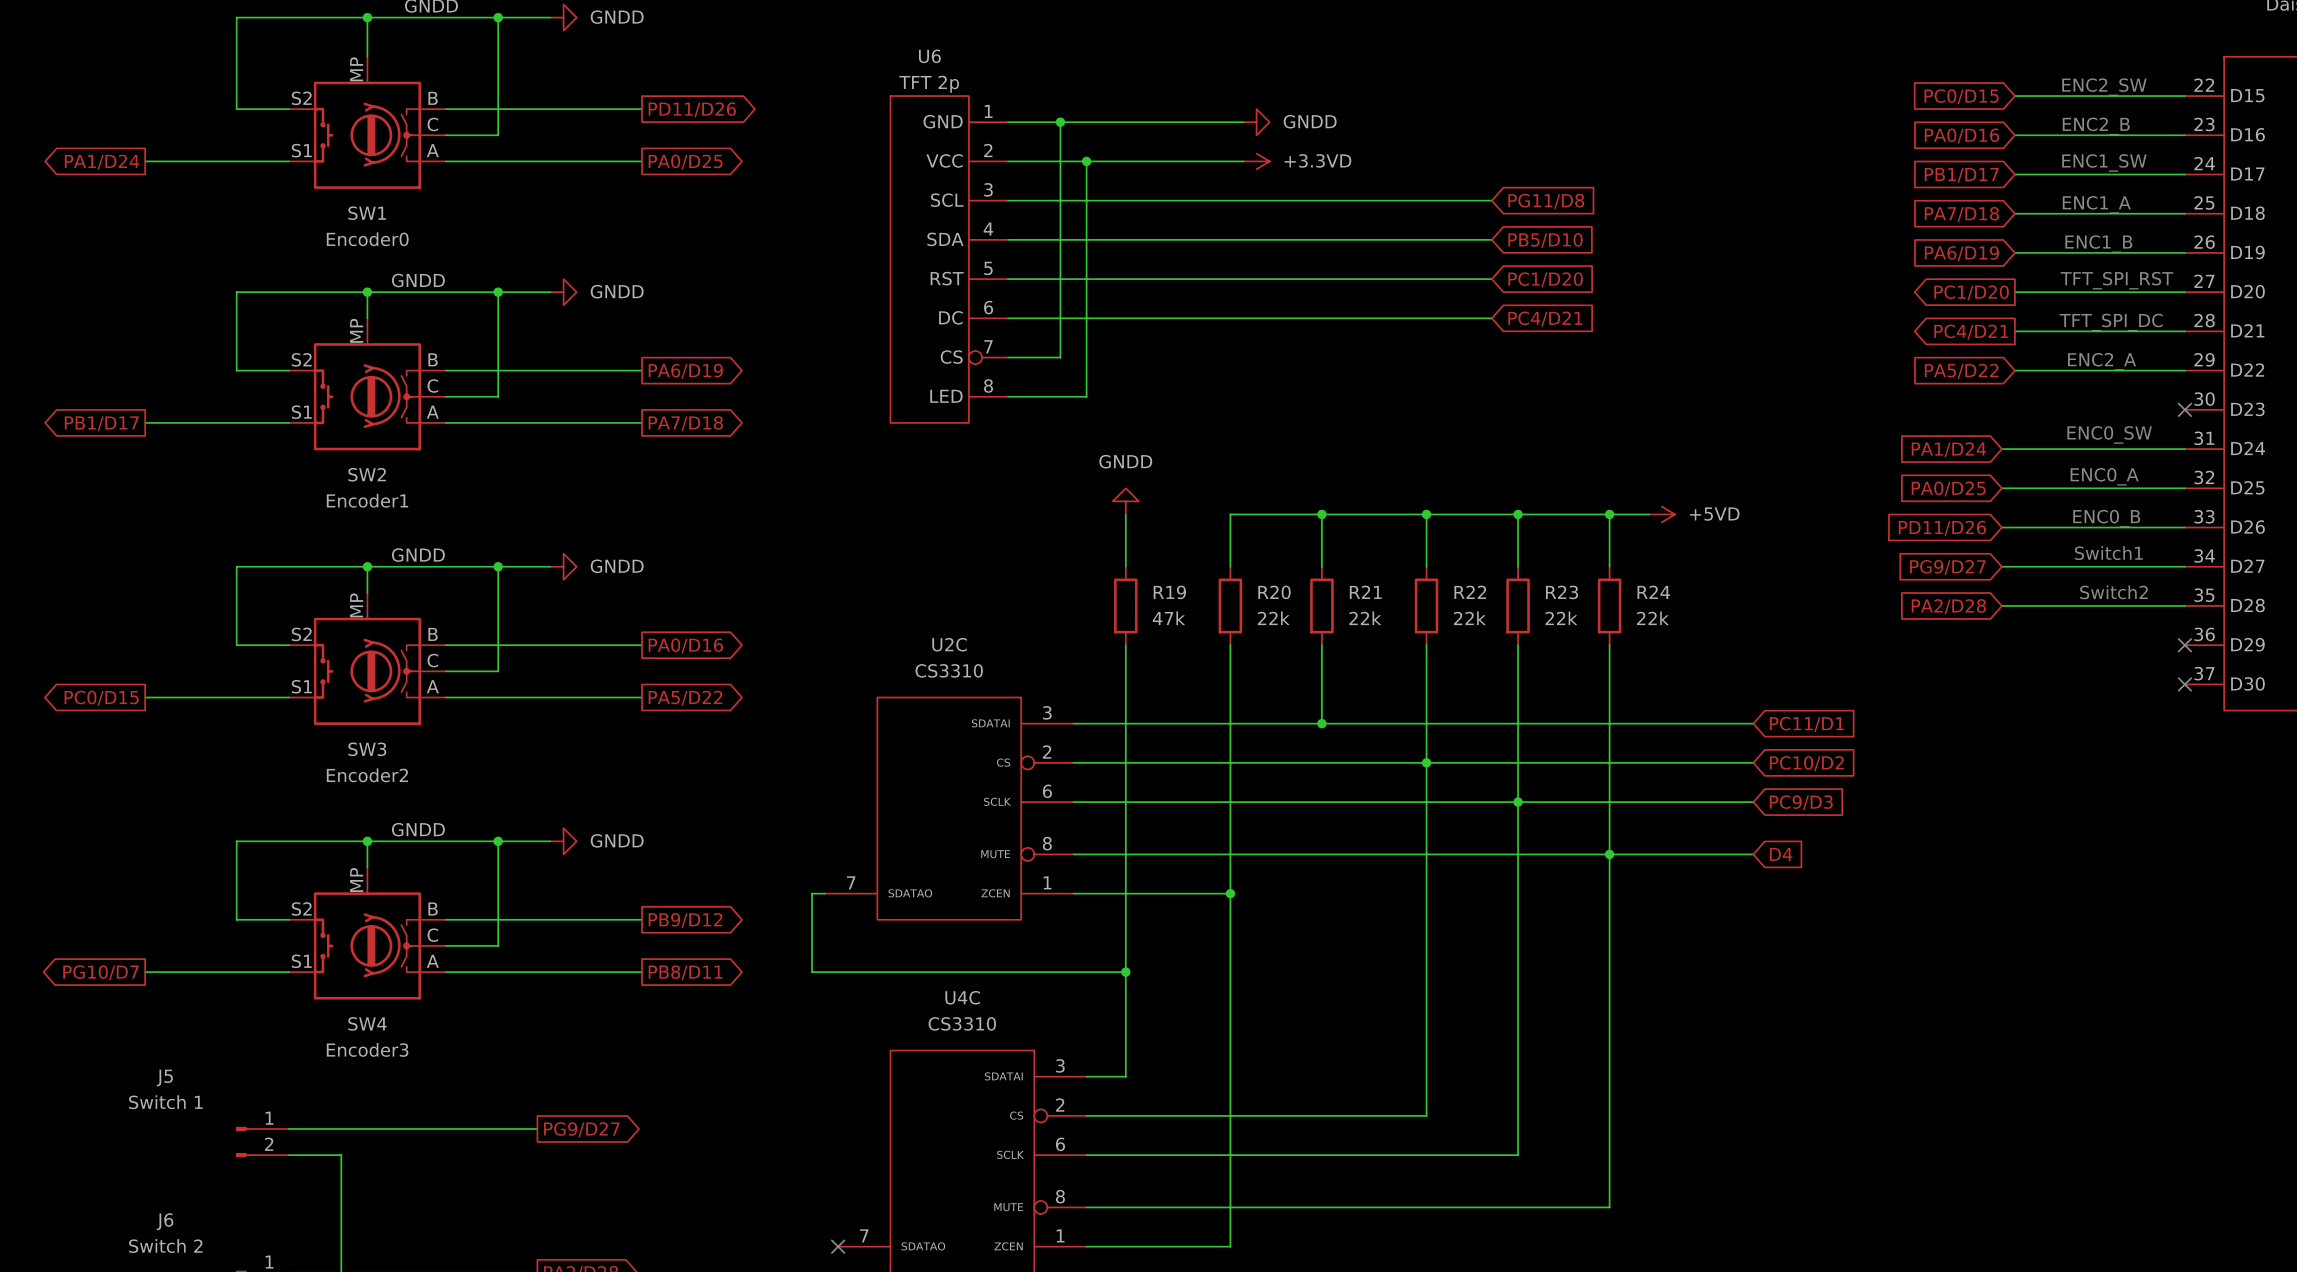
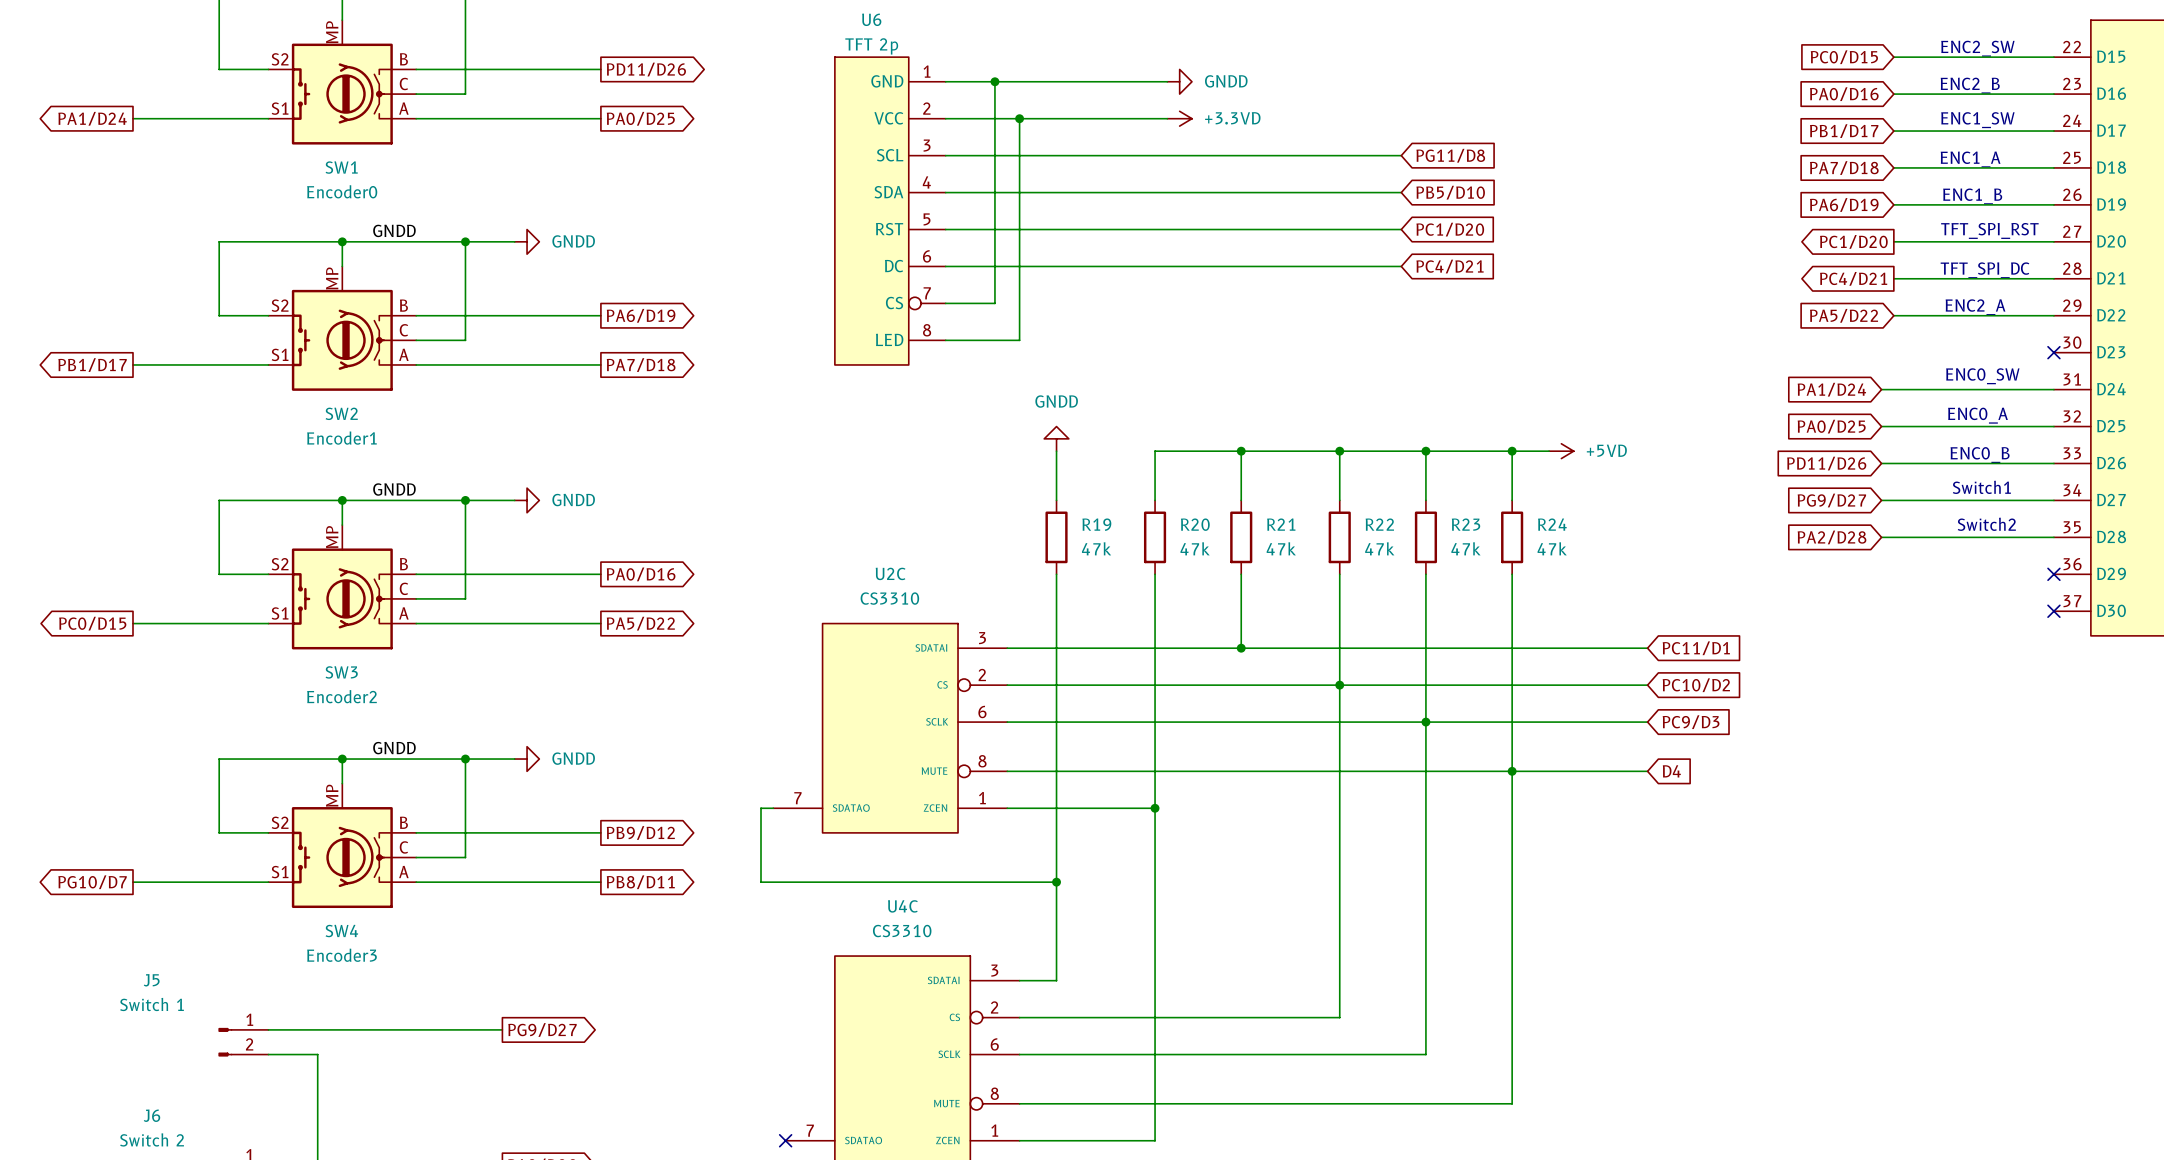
R20 value: 22k (1273, 618) -> 47k (1195, 548)
R21 value: 22k (1365, 618) -> 47k (1281, 548)
R22 value: 22k (1469, 618) -> 47k (1379, 548)
R23 value: 22k (1561, 618) -> 47k (1465, 548)
R24 value: 22k (1652, 618) -> 47k (1552, 548)

